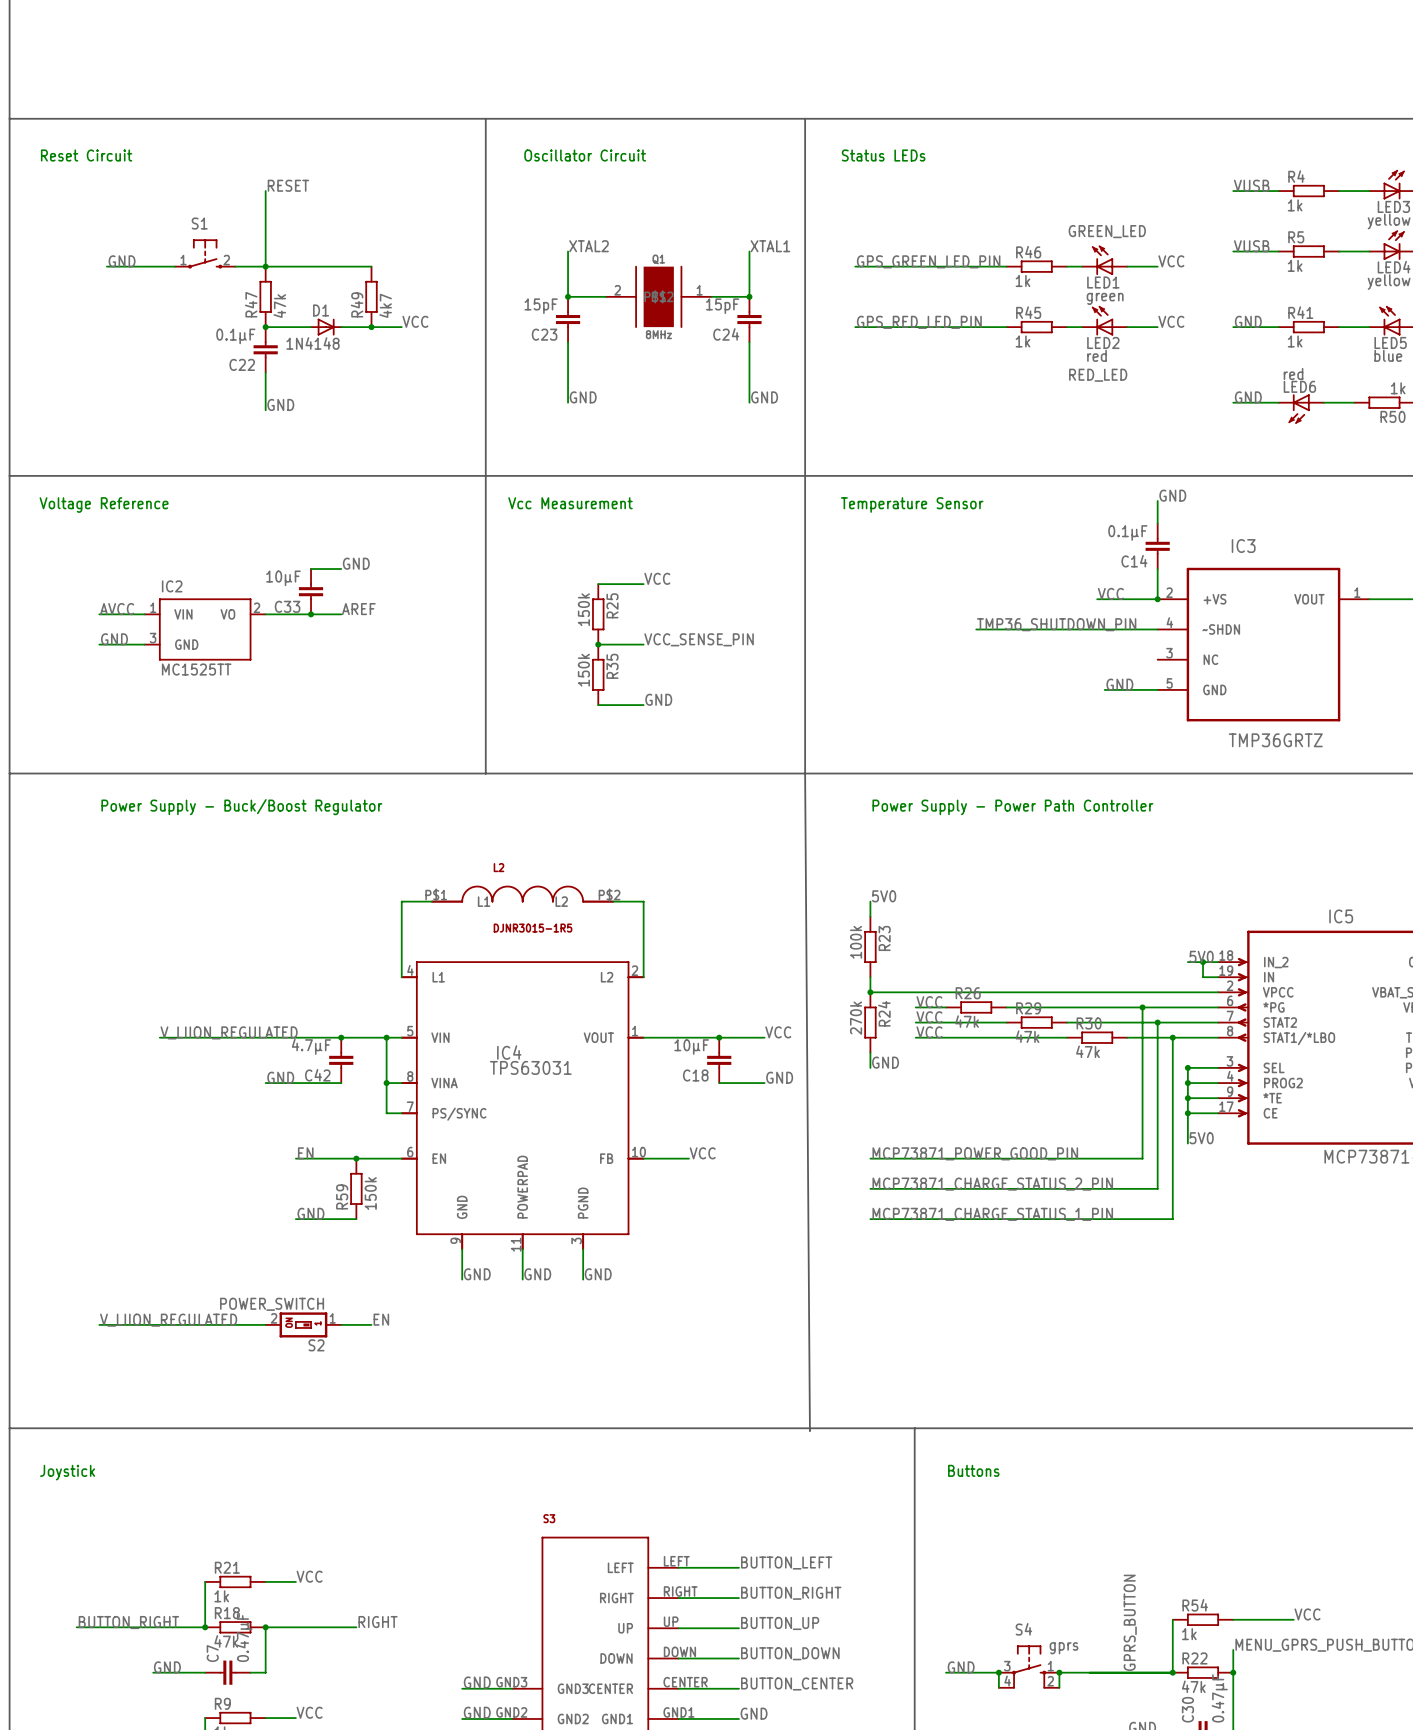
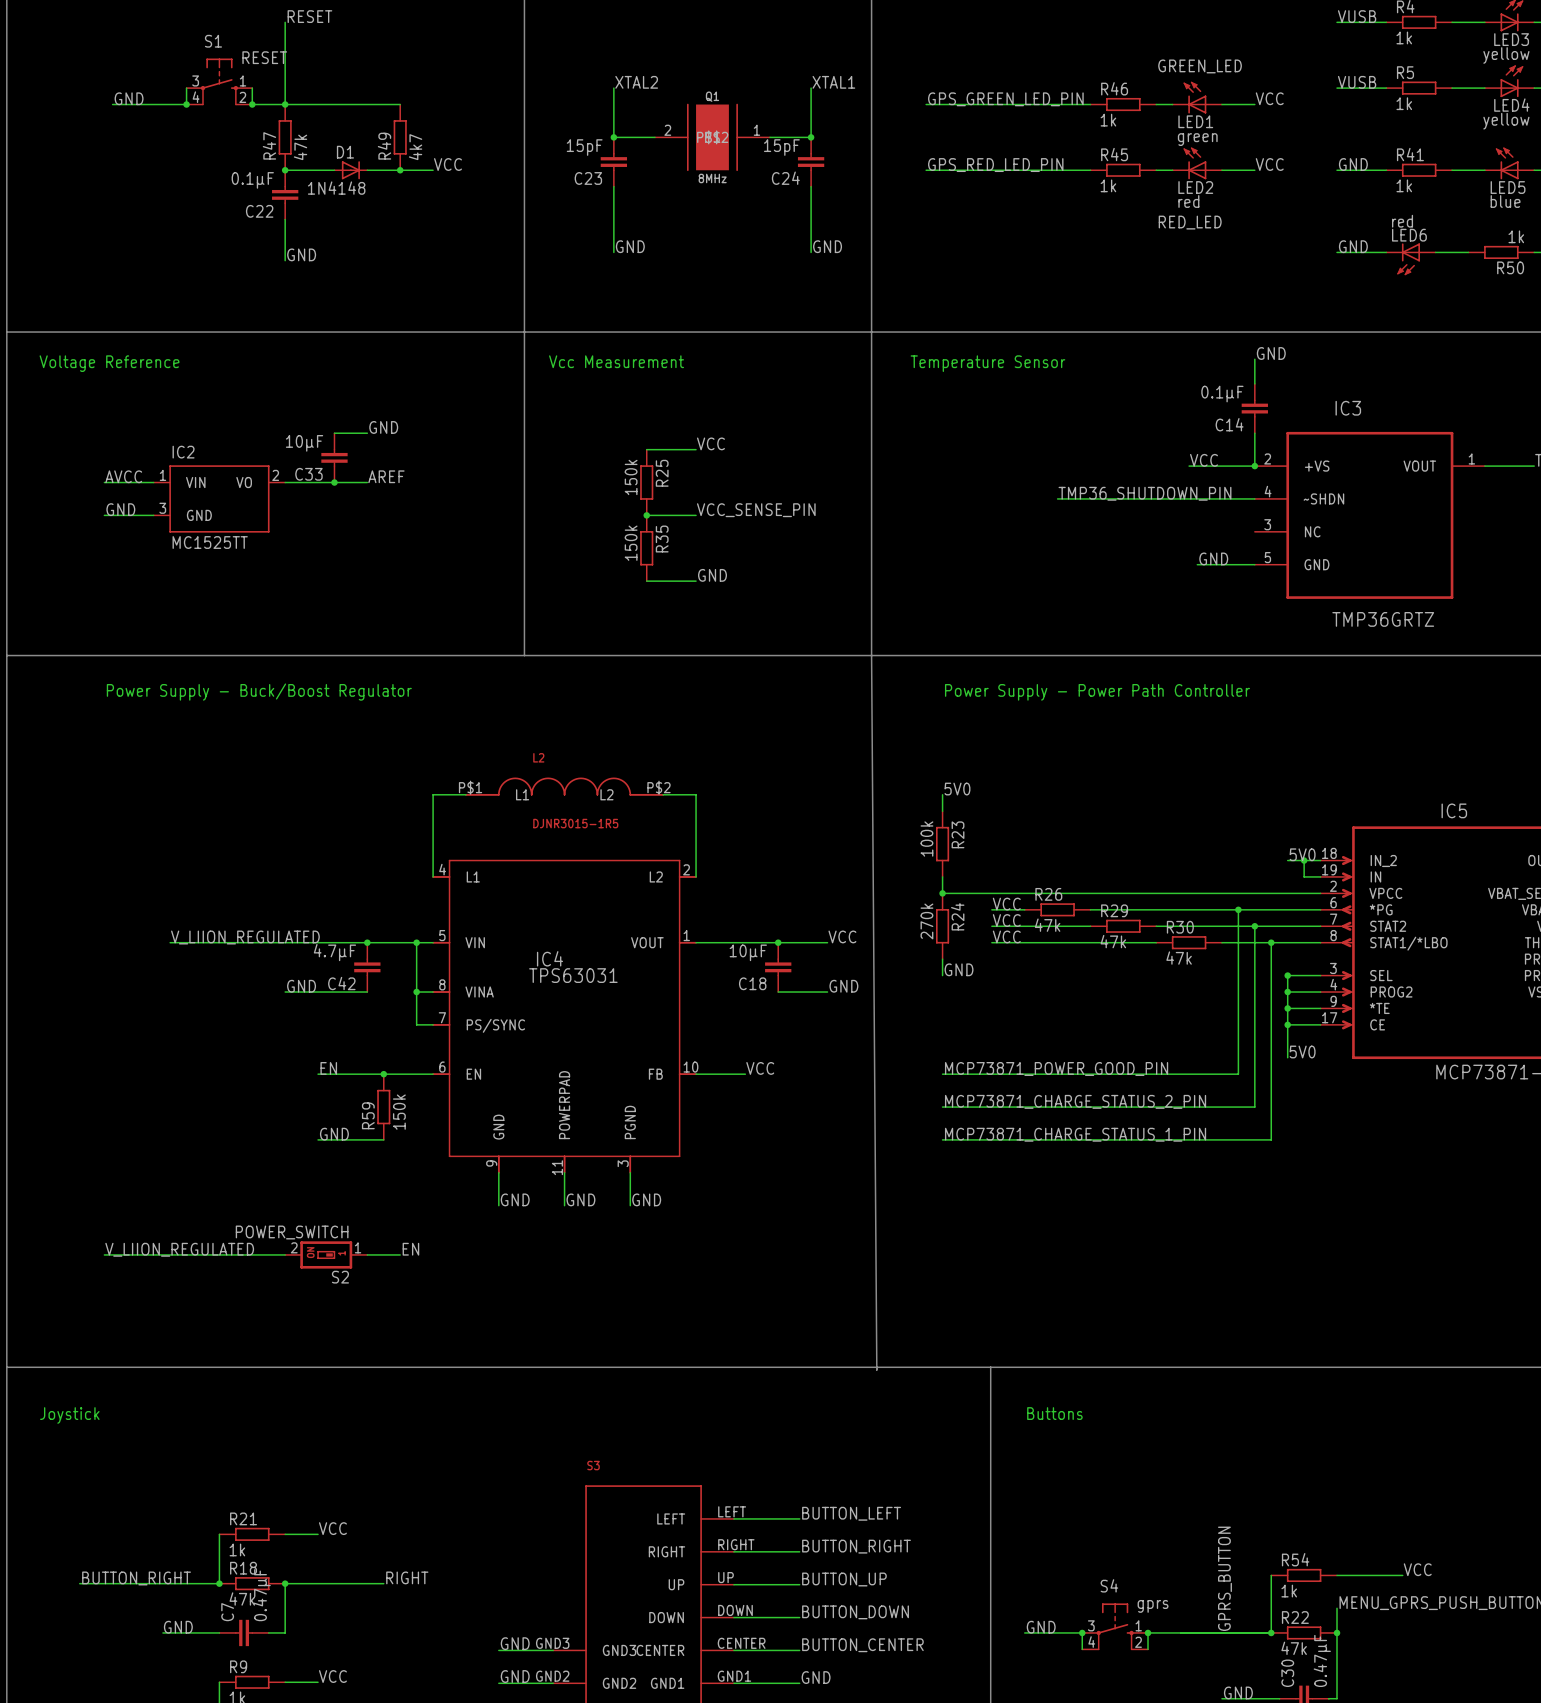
S1 value: none -> RESET (264, 57)
S1 symbol: [174, 239, 236, 269] -> [186, 58, 253, 106]
wire: none -> (186, 88) (186, 104)
wire: none -> (252, 88) (252, 104)
junction: none -> (186, 104)
junction: none -> (252, 104)

